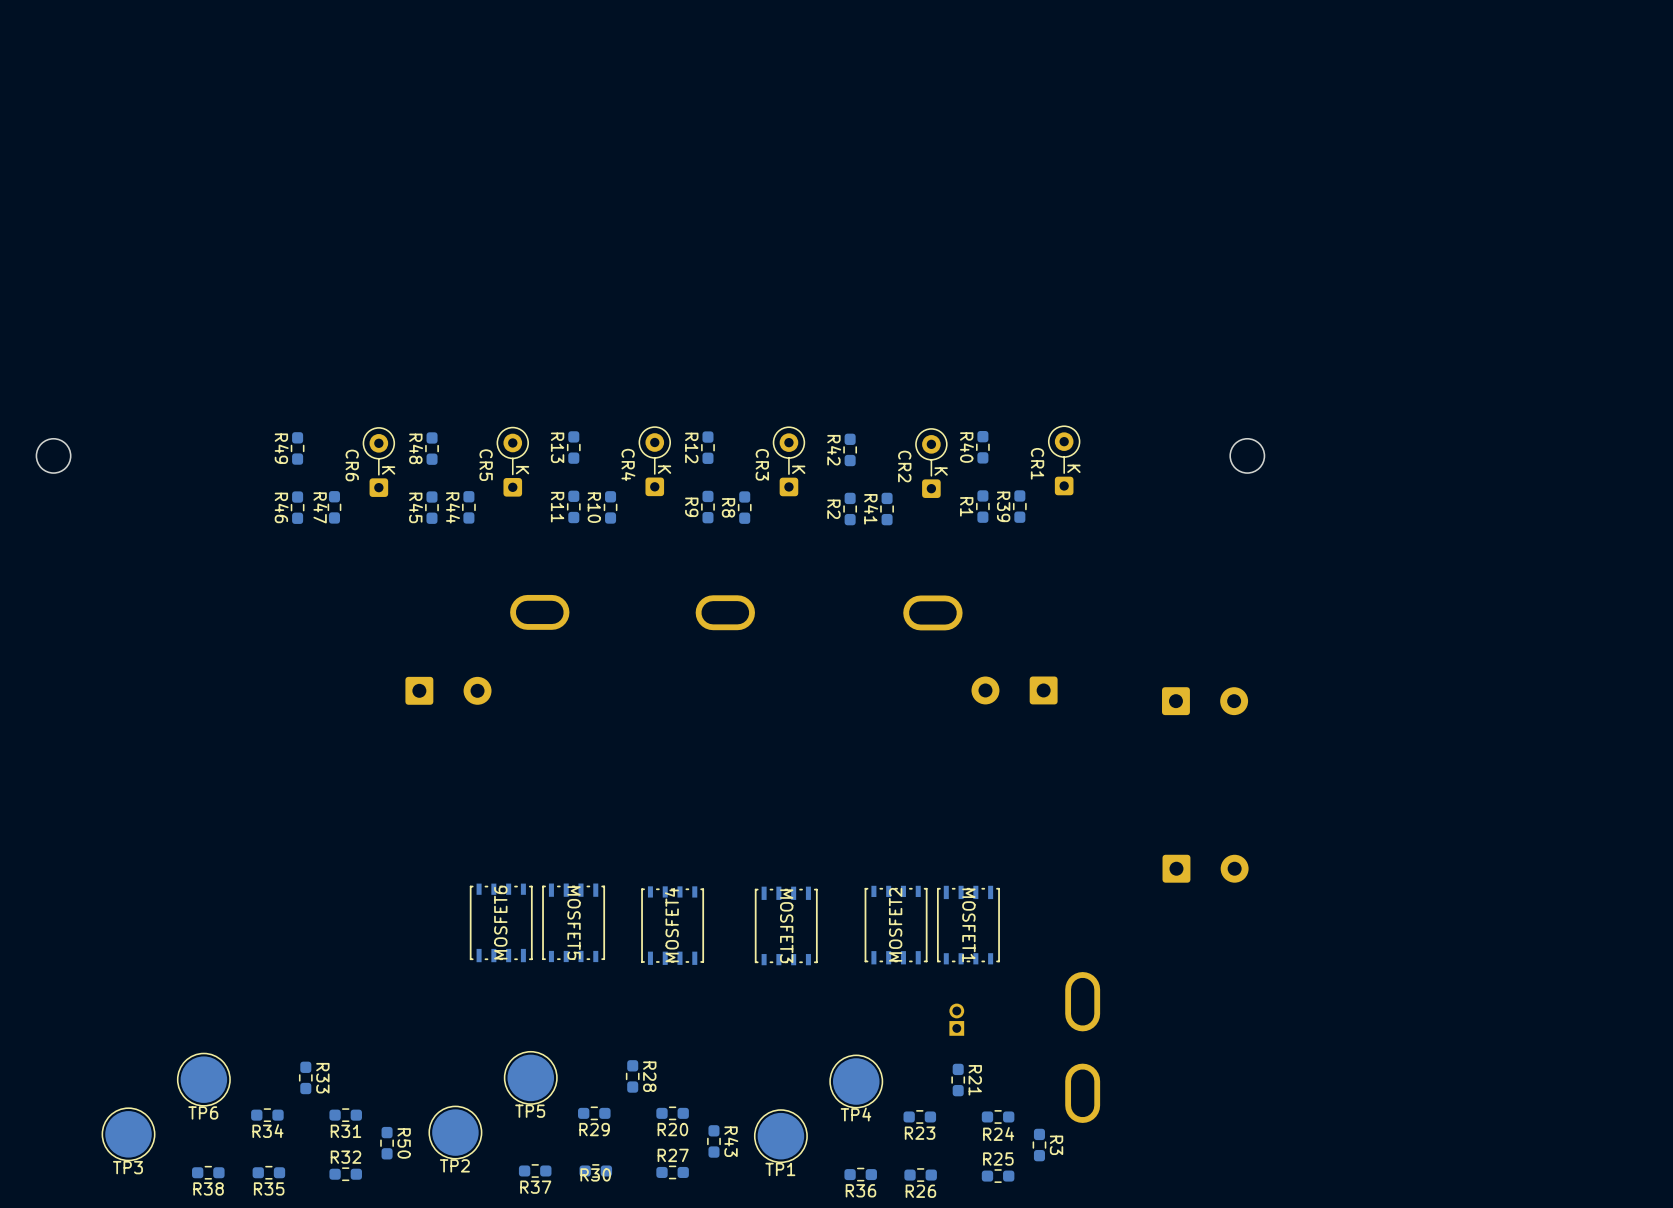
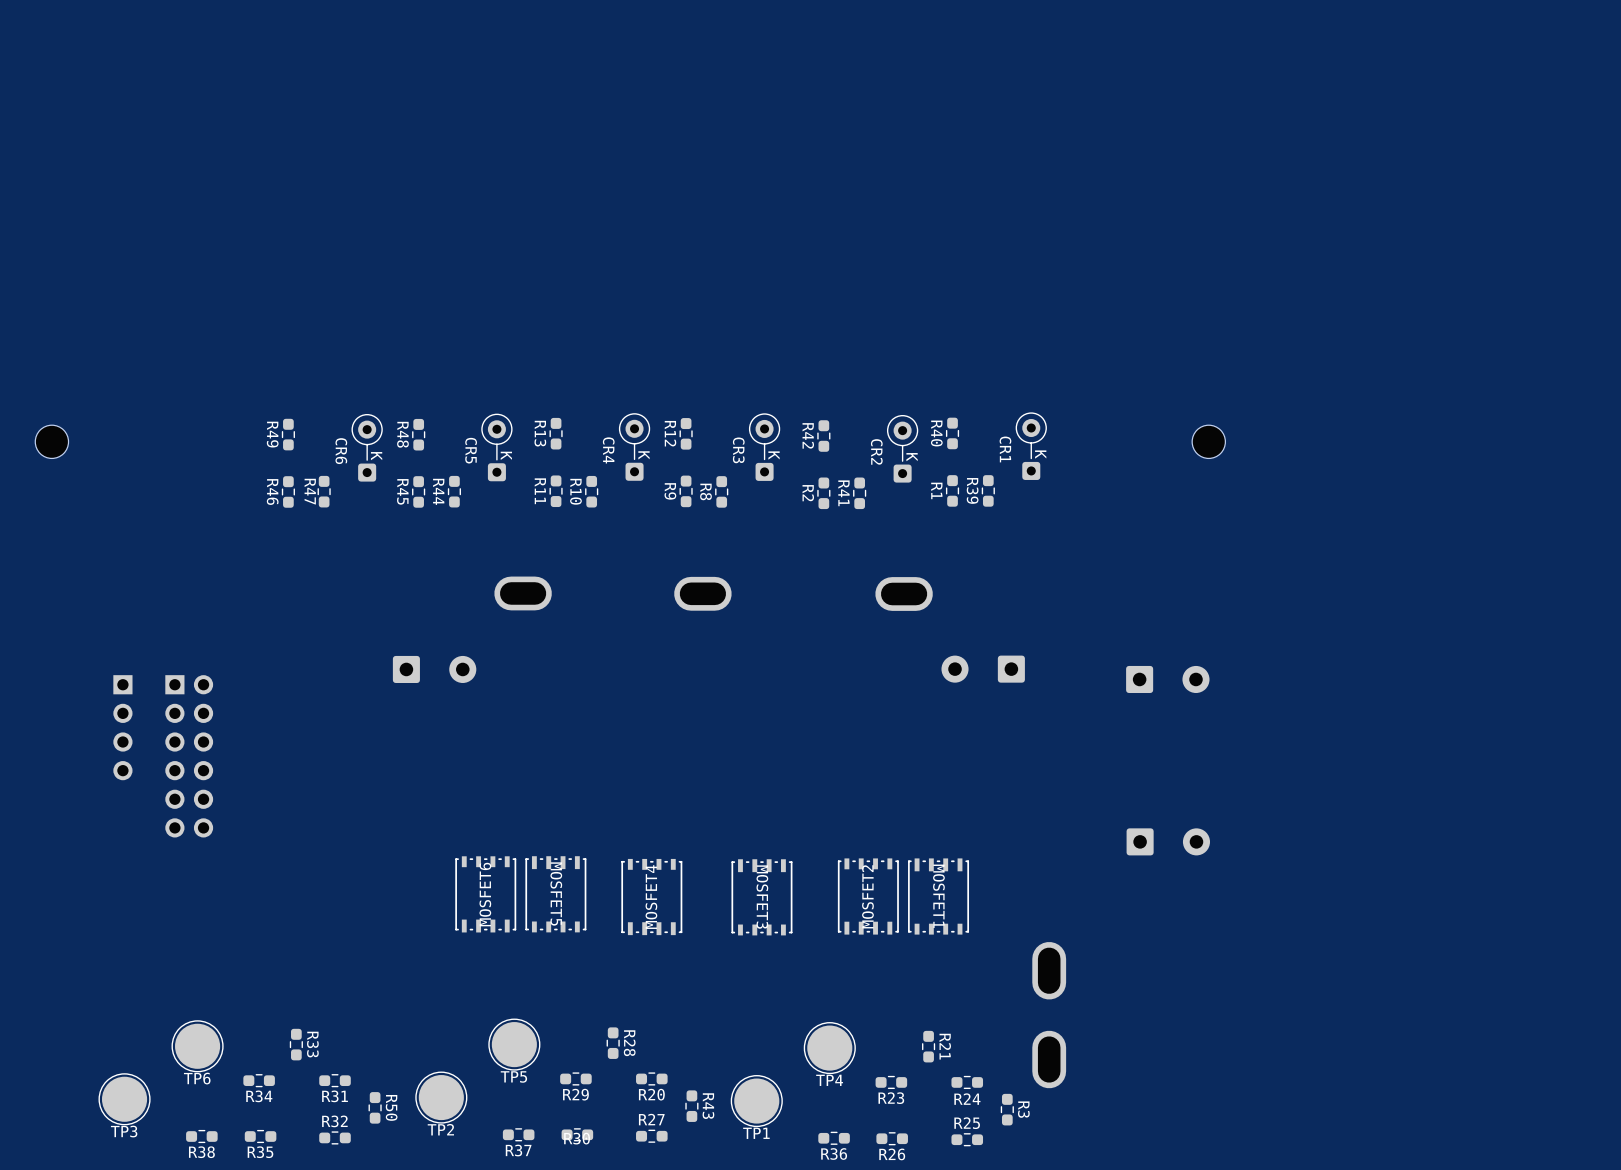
part: none -> (122, 727)
part: none -> (189, 756)
part: (956, 1019) -> none

